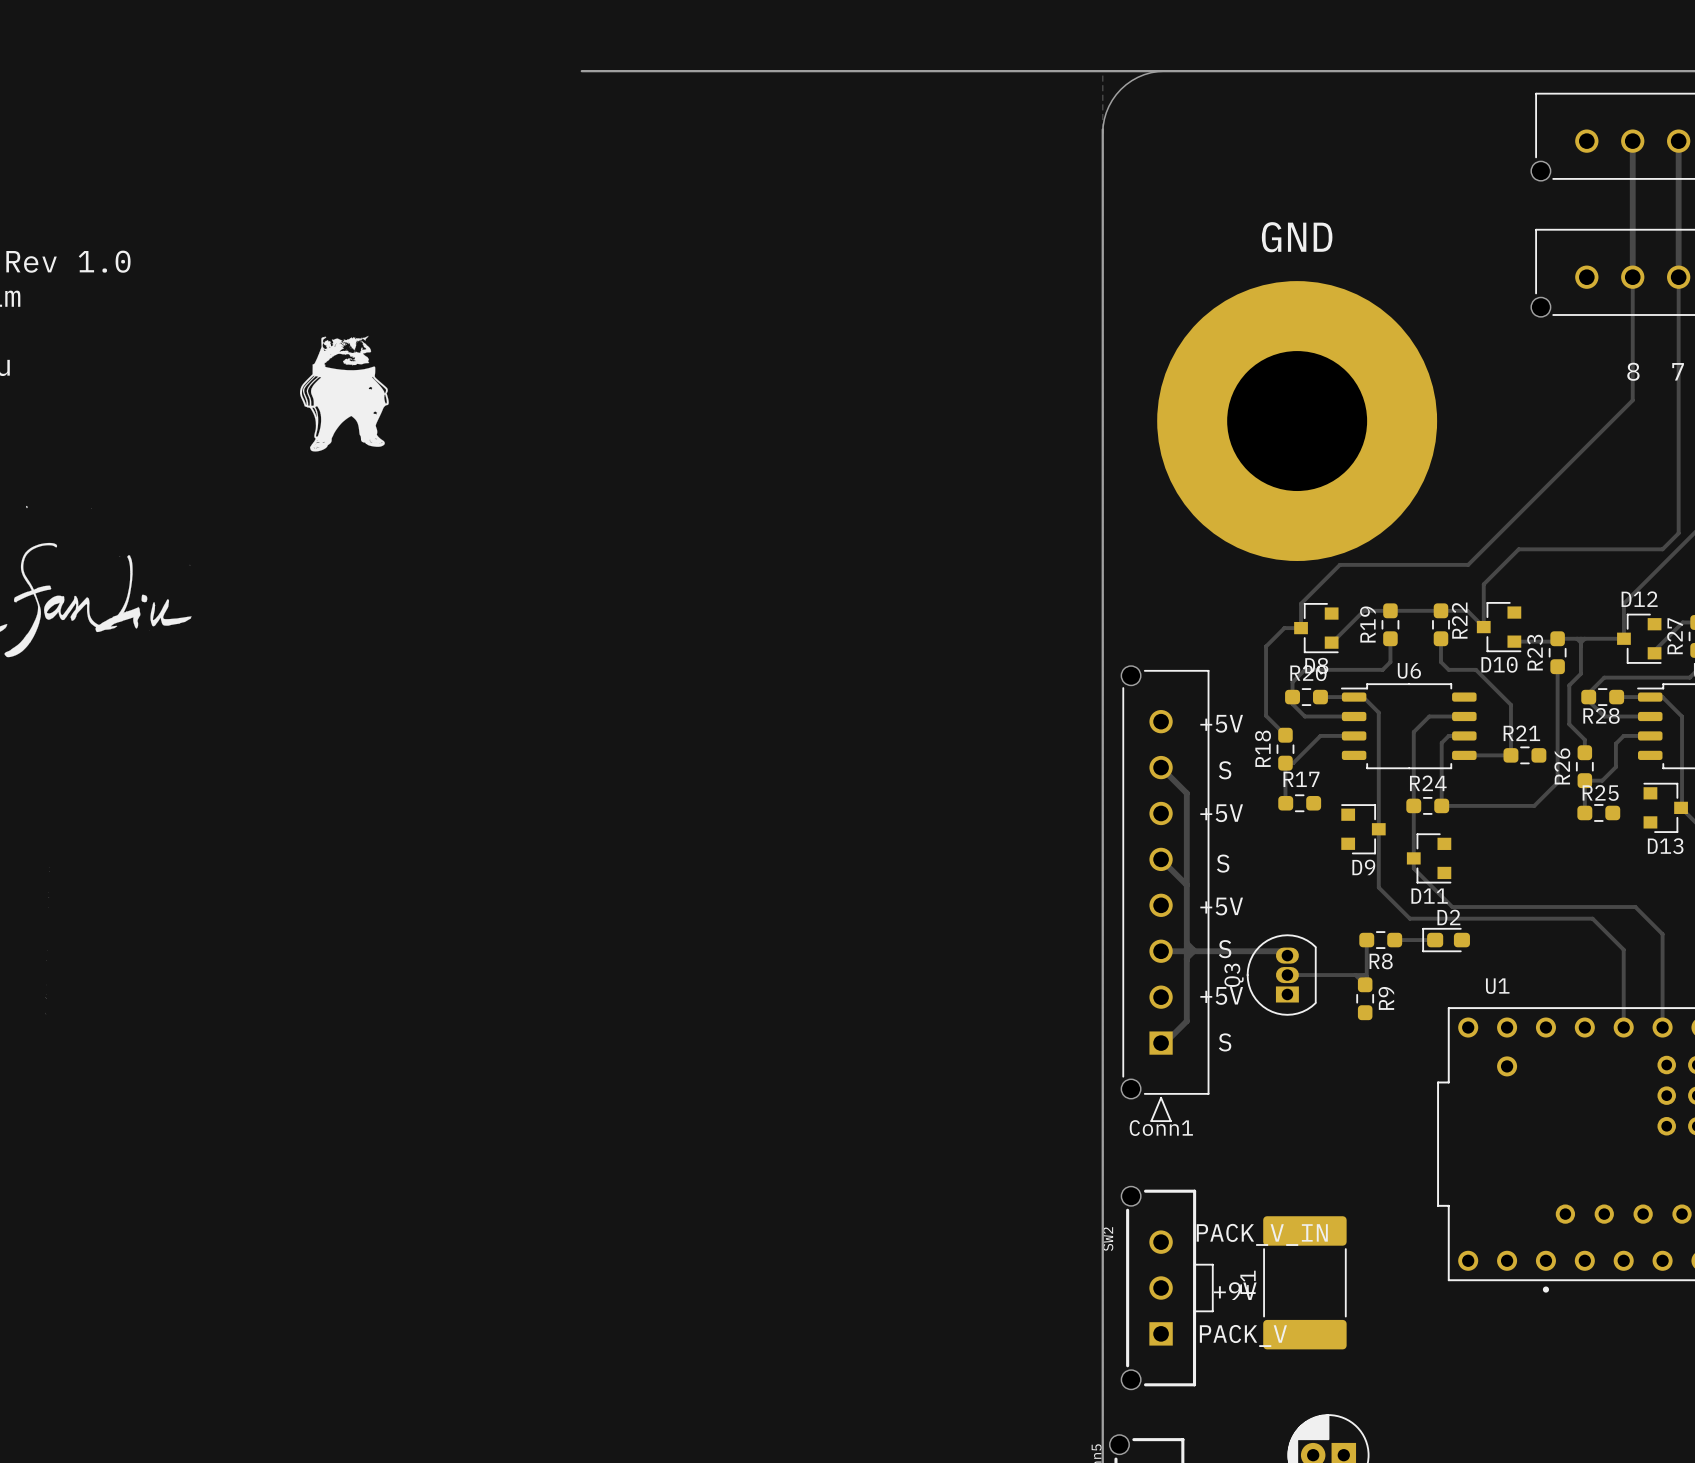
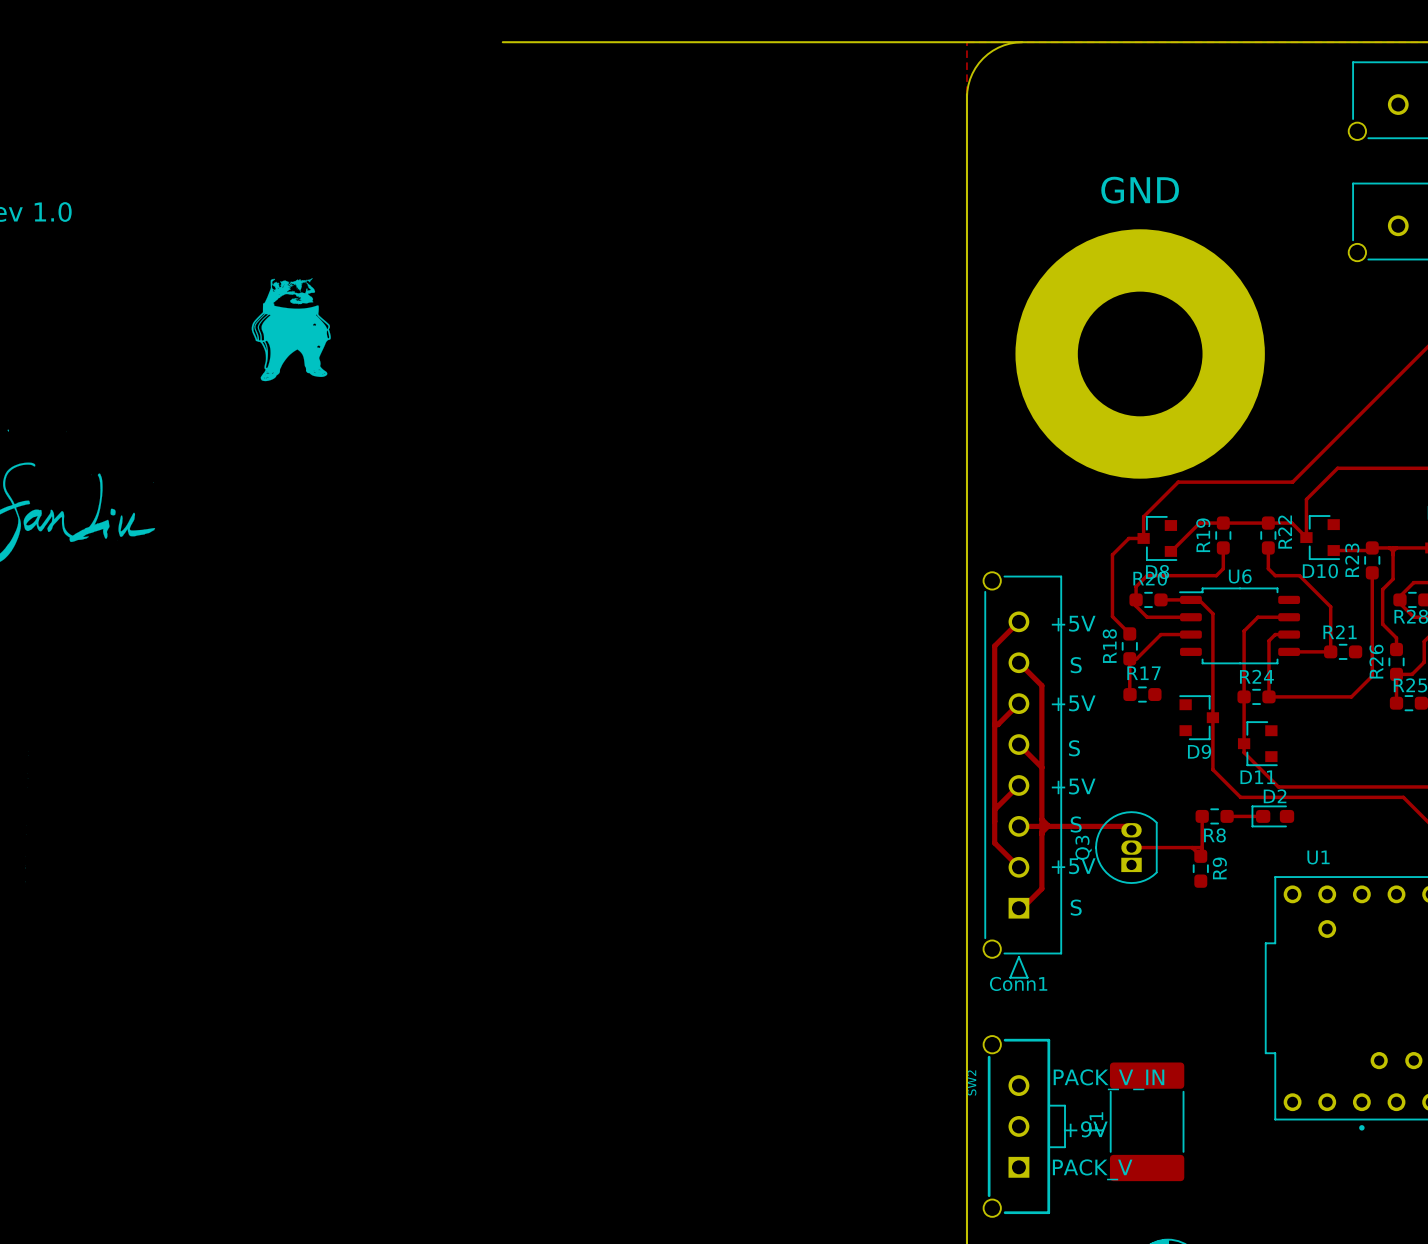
track: none -> (1018, 621) (994, 646) (994, 843) (1018, 867)
track: none -> (1018, 703) (997, 724) (994, 724)
track: none -> (1018, 785) (994, 809)

